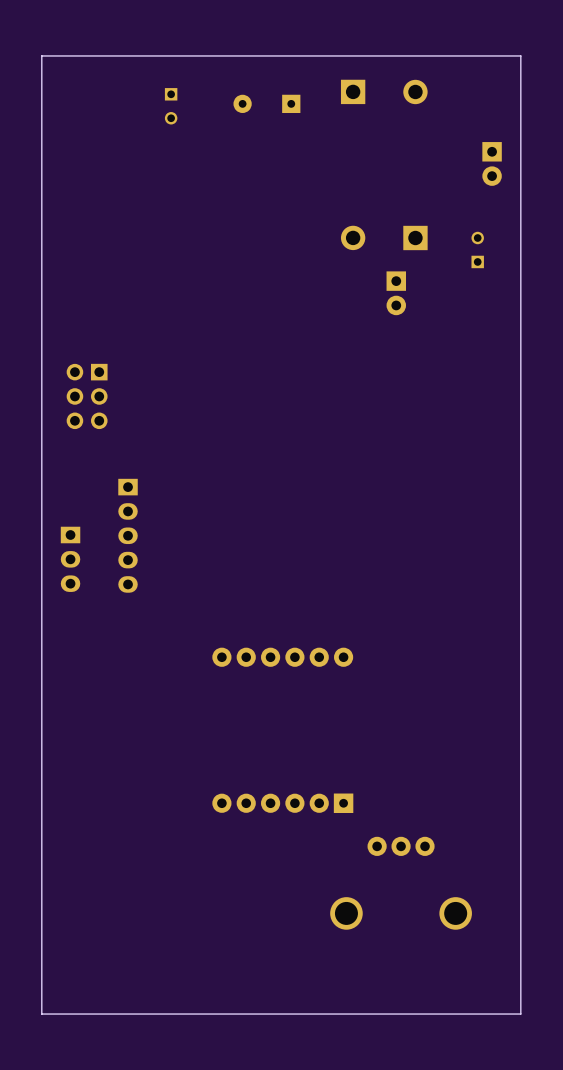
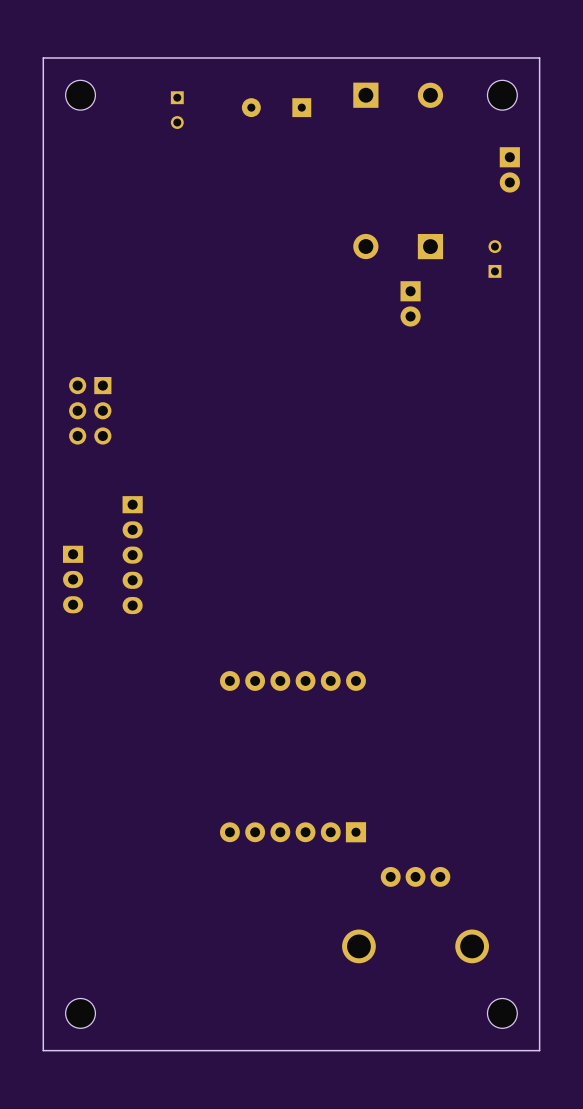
part: none -> (80, 95)
part: none -> (502, 95)
part: none -> (80, 1013)
part: none -> (502, 1013)

